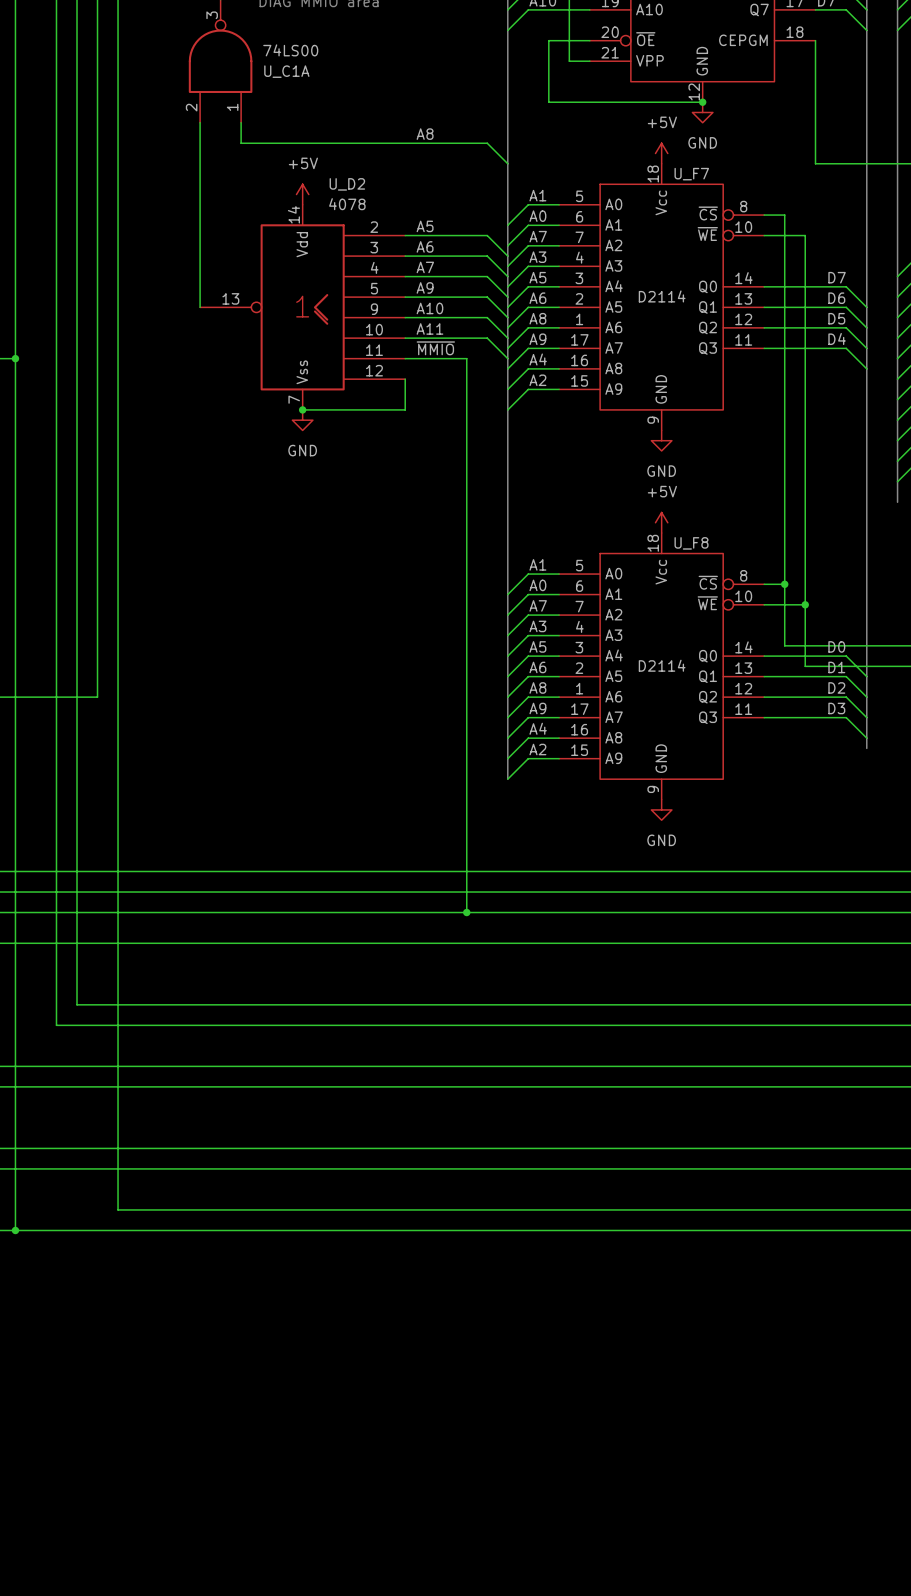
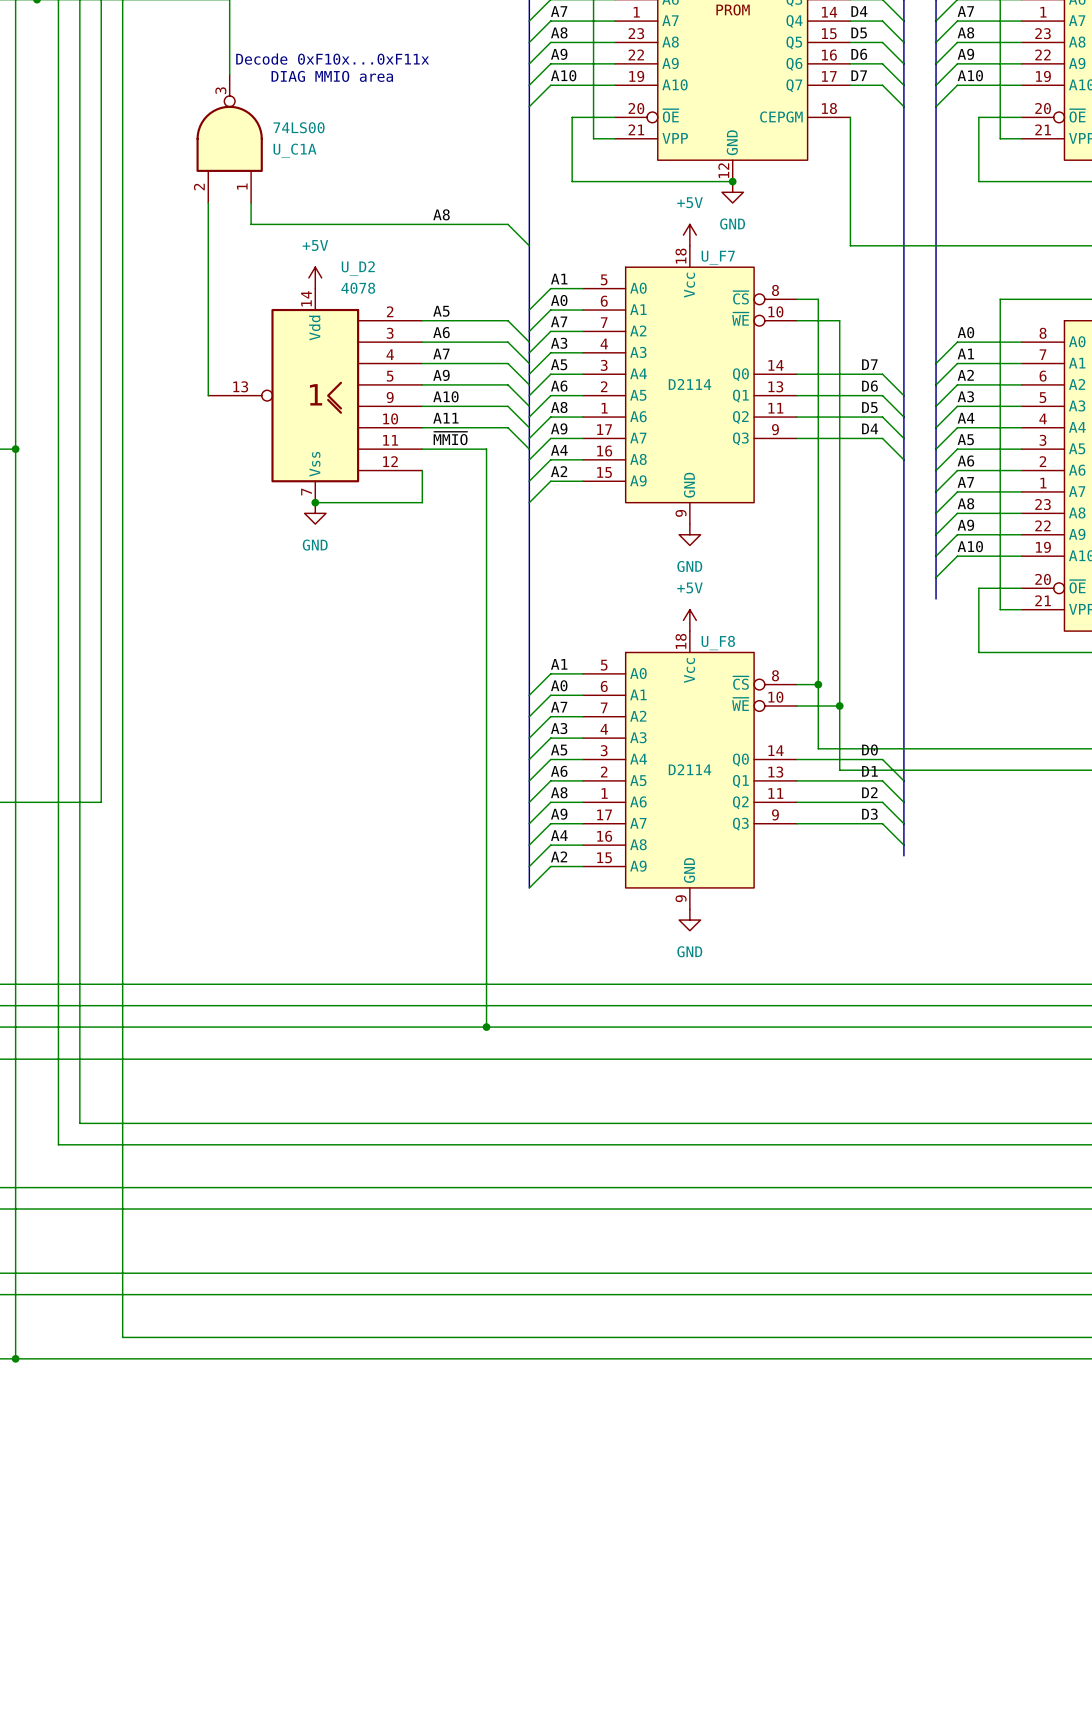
U_F7 pin number: 12 (743, 319) -> 11 (775, 408)
U_F7 pin number: 11 (743, 339) -> 9 (775, 429)
U_F8 pin number: 12 (743, 688) -> 11 (775, 793)
U_F8 pin number: 11 (743, 709) -> 9 (775, 814)

